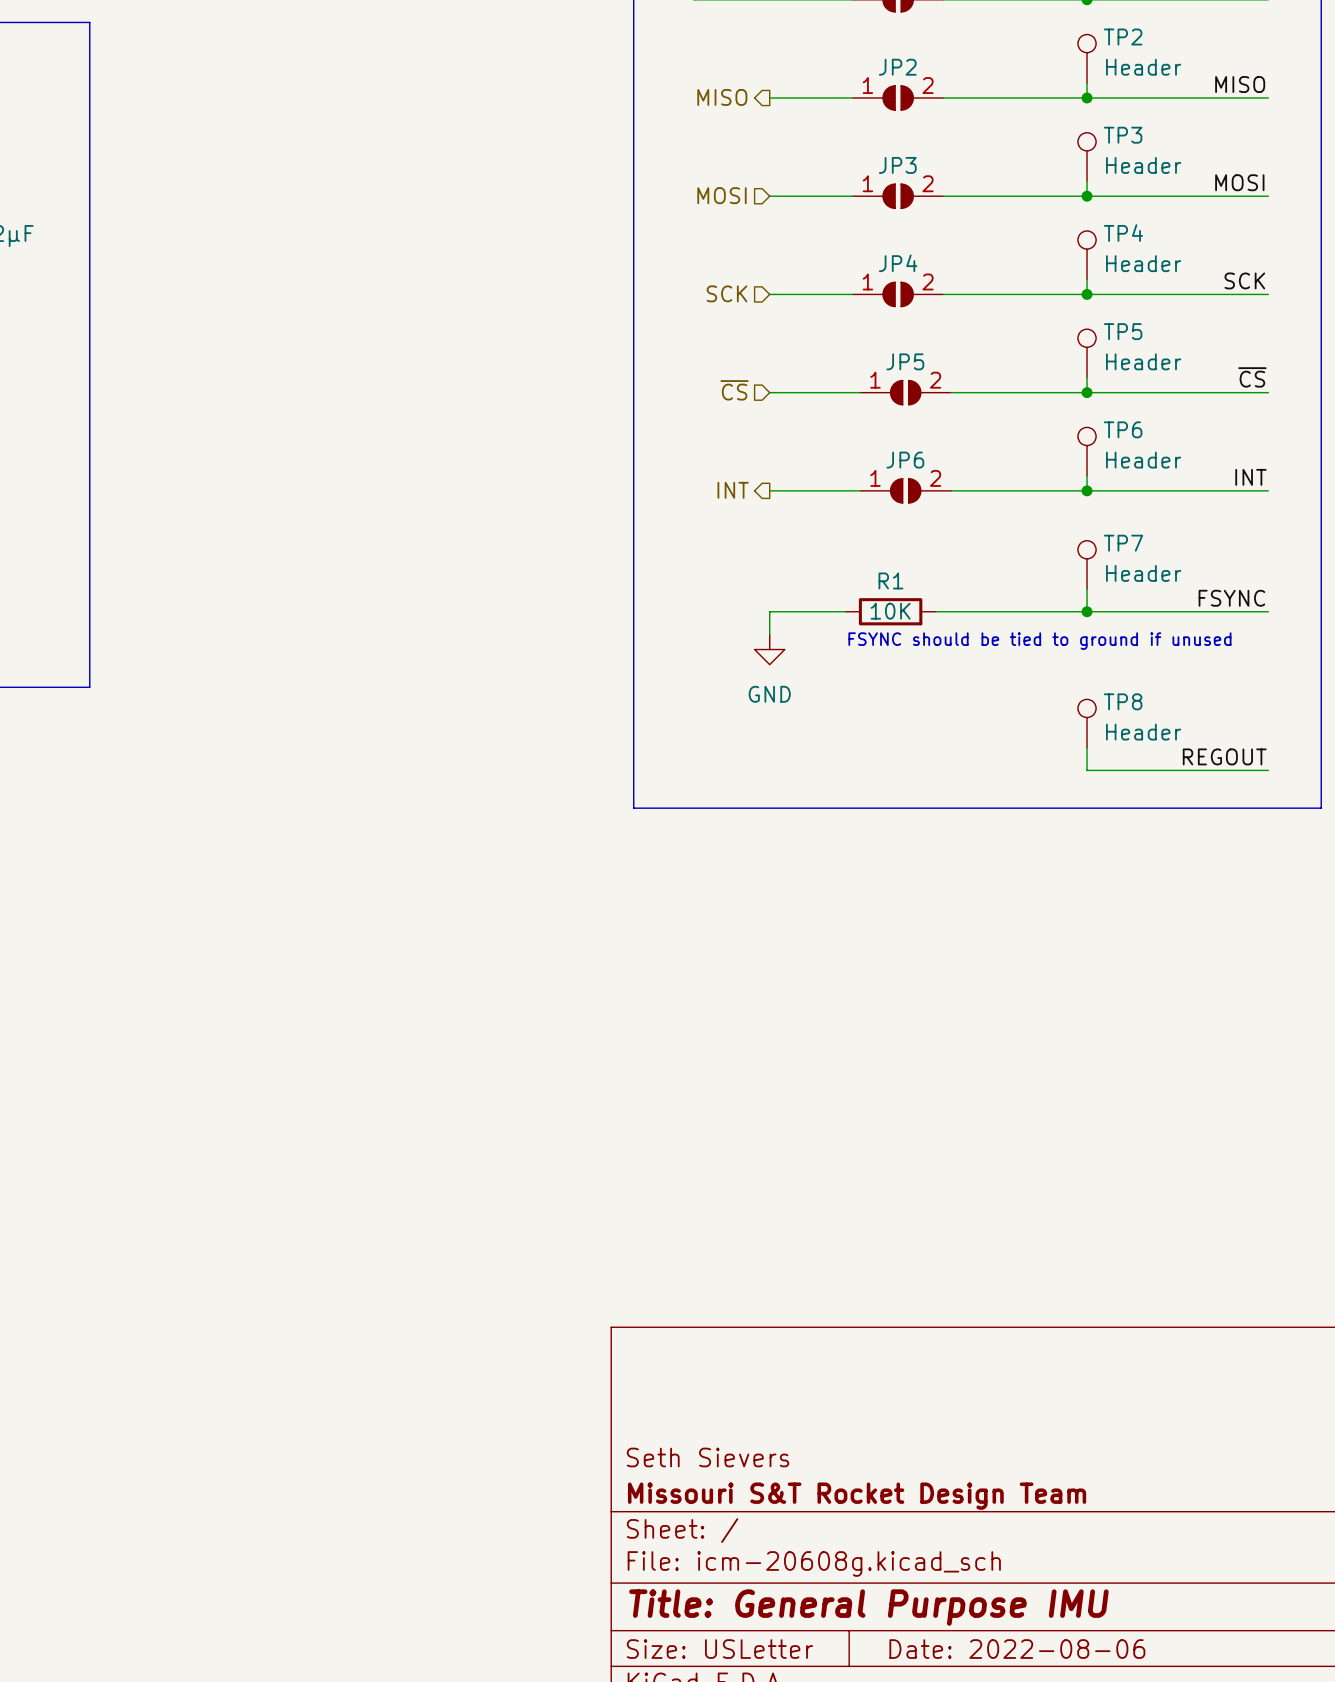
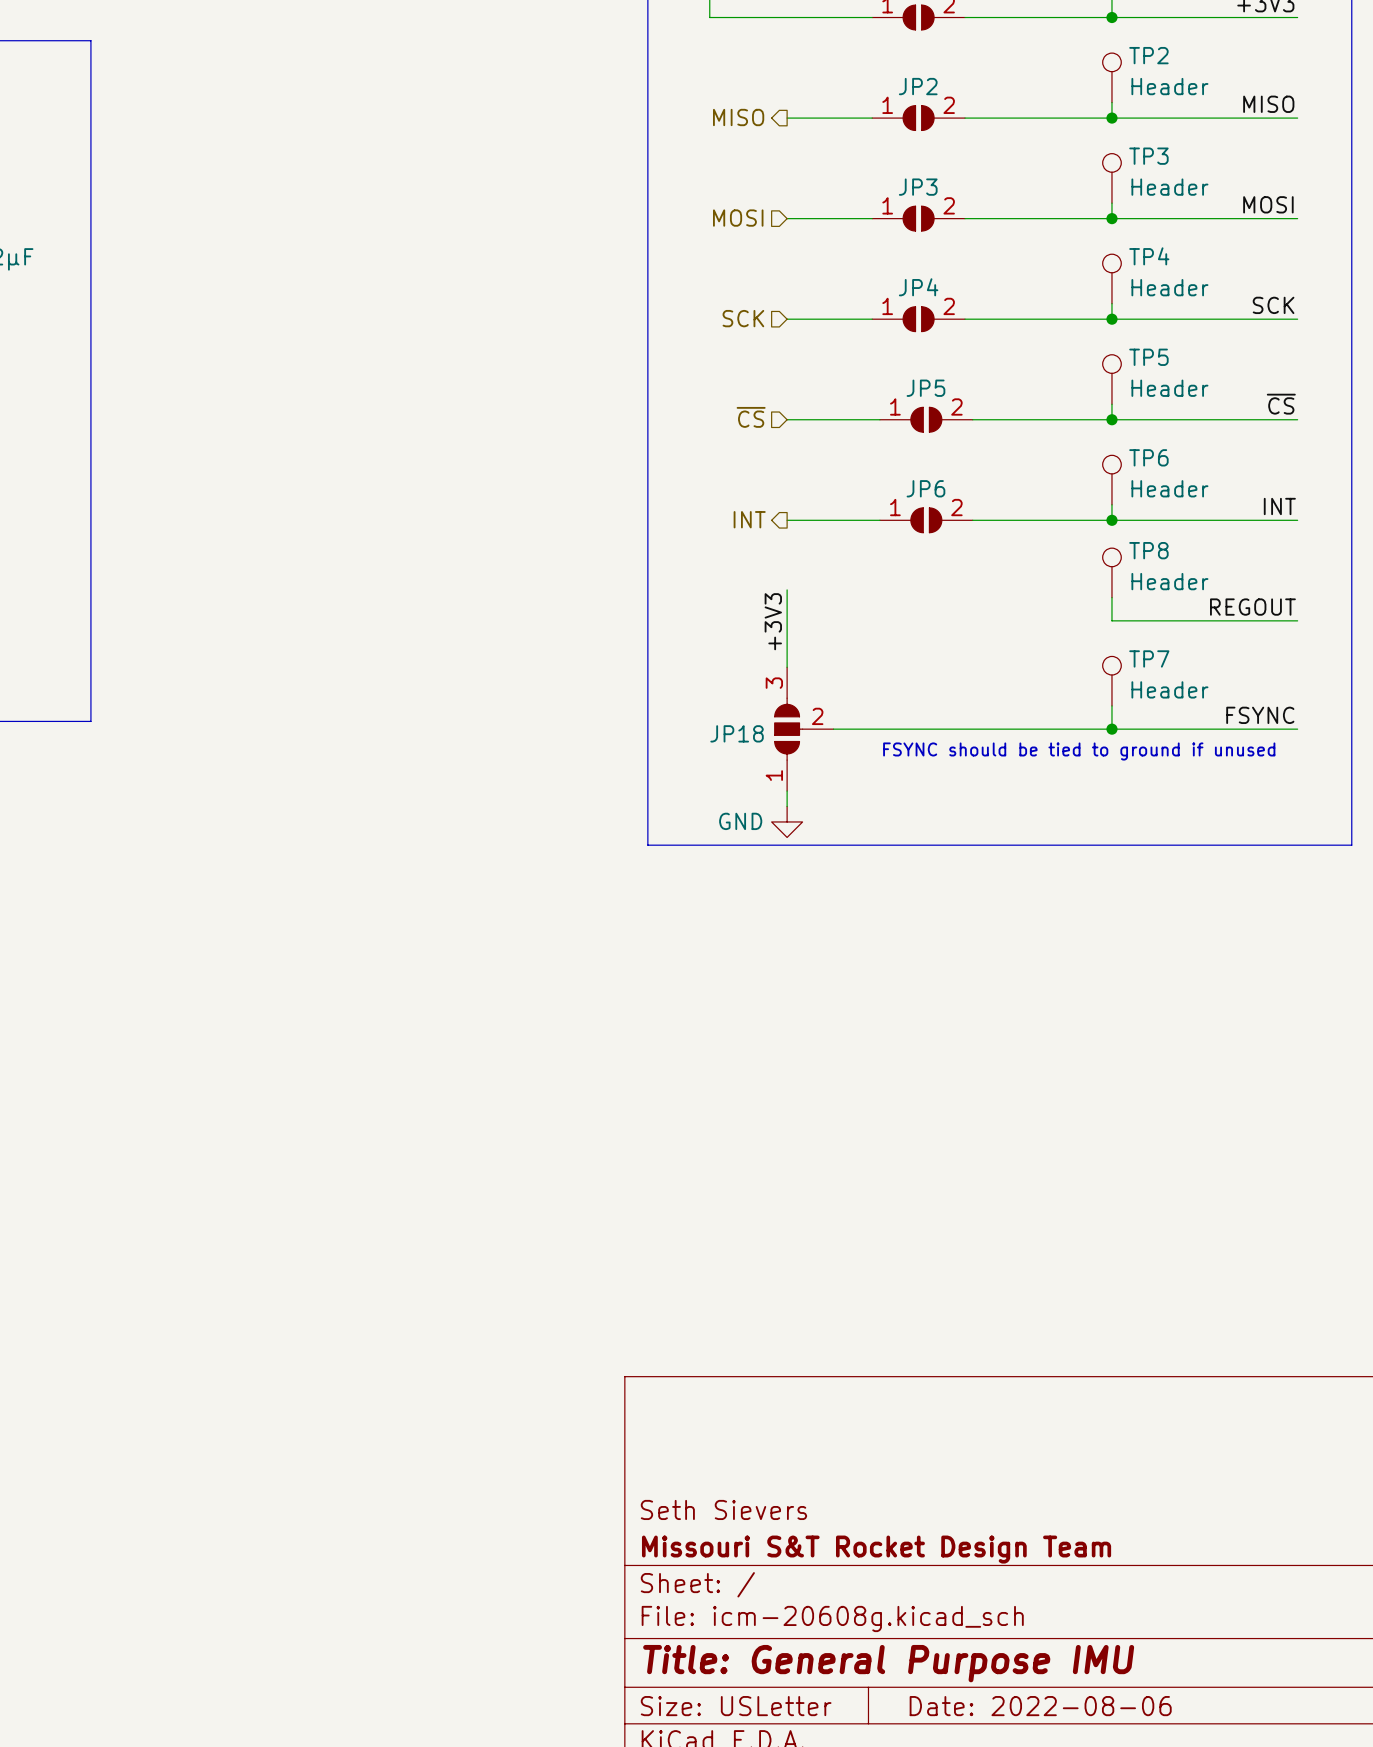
TP7 position: (1087, 564) -> (1111, 681)
label: none -> +3V3 (773, 621)
wire: (1087, 589) (1087, 611) -> (1111, 705) (1111, 729)
label position: FSYNC (1231, 598) -> FSYNC (1260, 715)
wire: (769, 611) (845, 611) -> (787, 644) (787, 589)
R1: 10K (890, 611) -> none
wire: (935, 611) (1268, 611) -> none
junction: (1087, 611) -> none
text position: FSYNC should be tied to ground if unused (1039, 641) -> FSYNC should be tied to ground if unused (1079, 751)
power symbol position: GND (769, 649) -> GND (787, 821)
power symbol text position: GND (769, 694) -> GND (740, 821)
JP18: none -> (804, 729)
wire: none -> (833, 729) (1297, 729)
junction: none -> (1111, 729)
TP8 position: (1087, 723) -> (1111, 572)
wire: (1087, 747) (1087, 770) (1268, 770) -> (1111, 597) (1111, 620) (1297, 620)
wire: none -> (787, 791) (787, 806)
label position: REGOUT (1224, 756) -> REGOUT (1252, 607)

